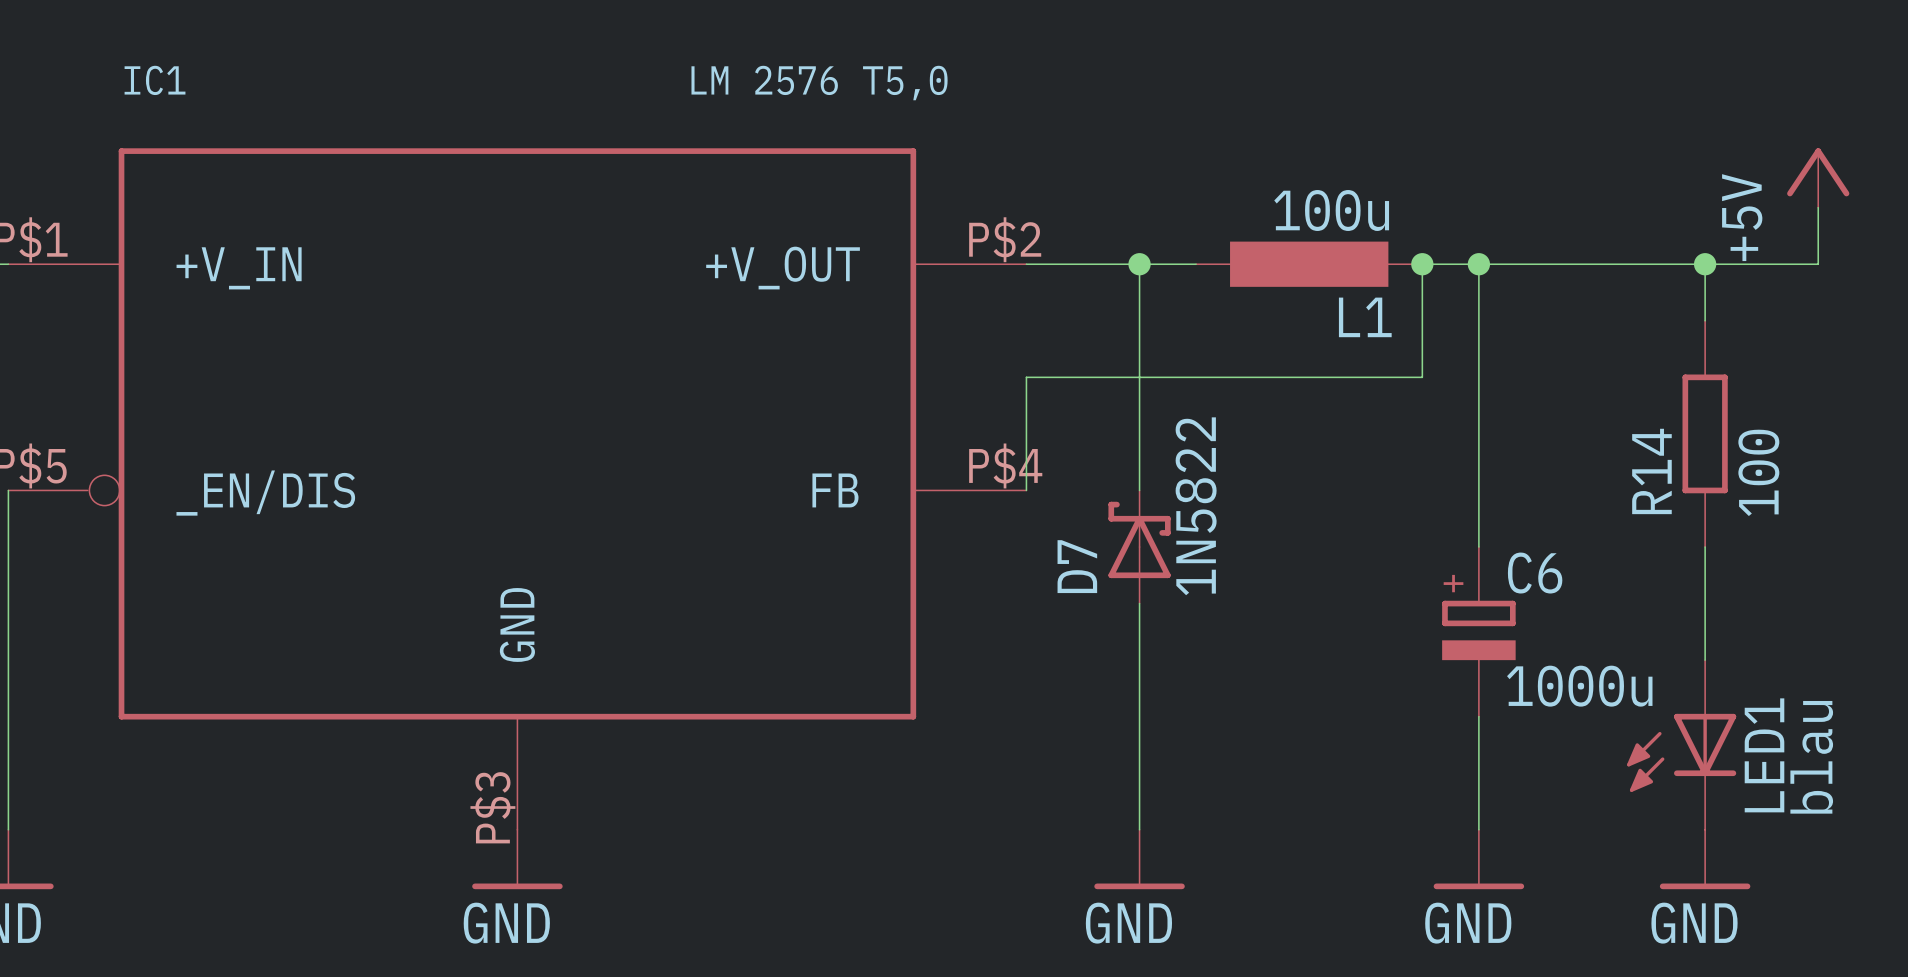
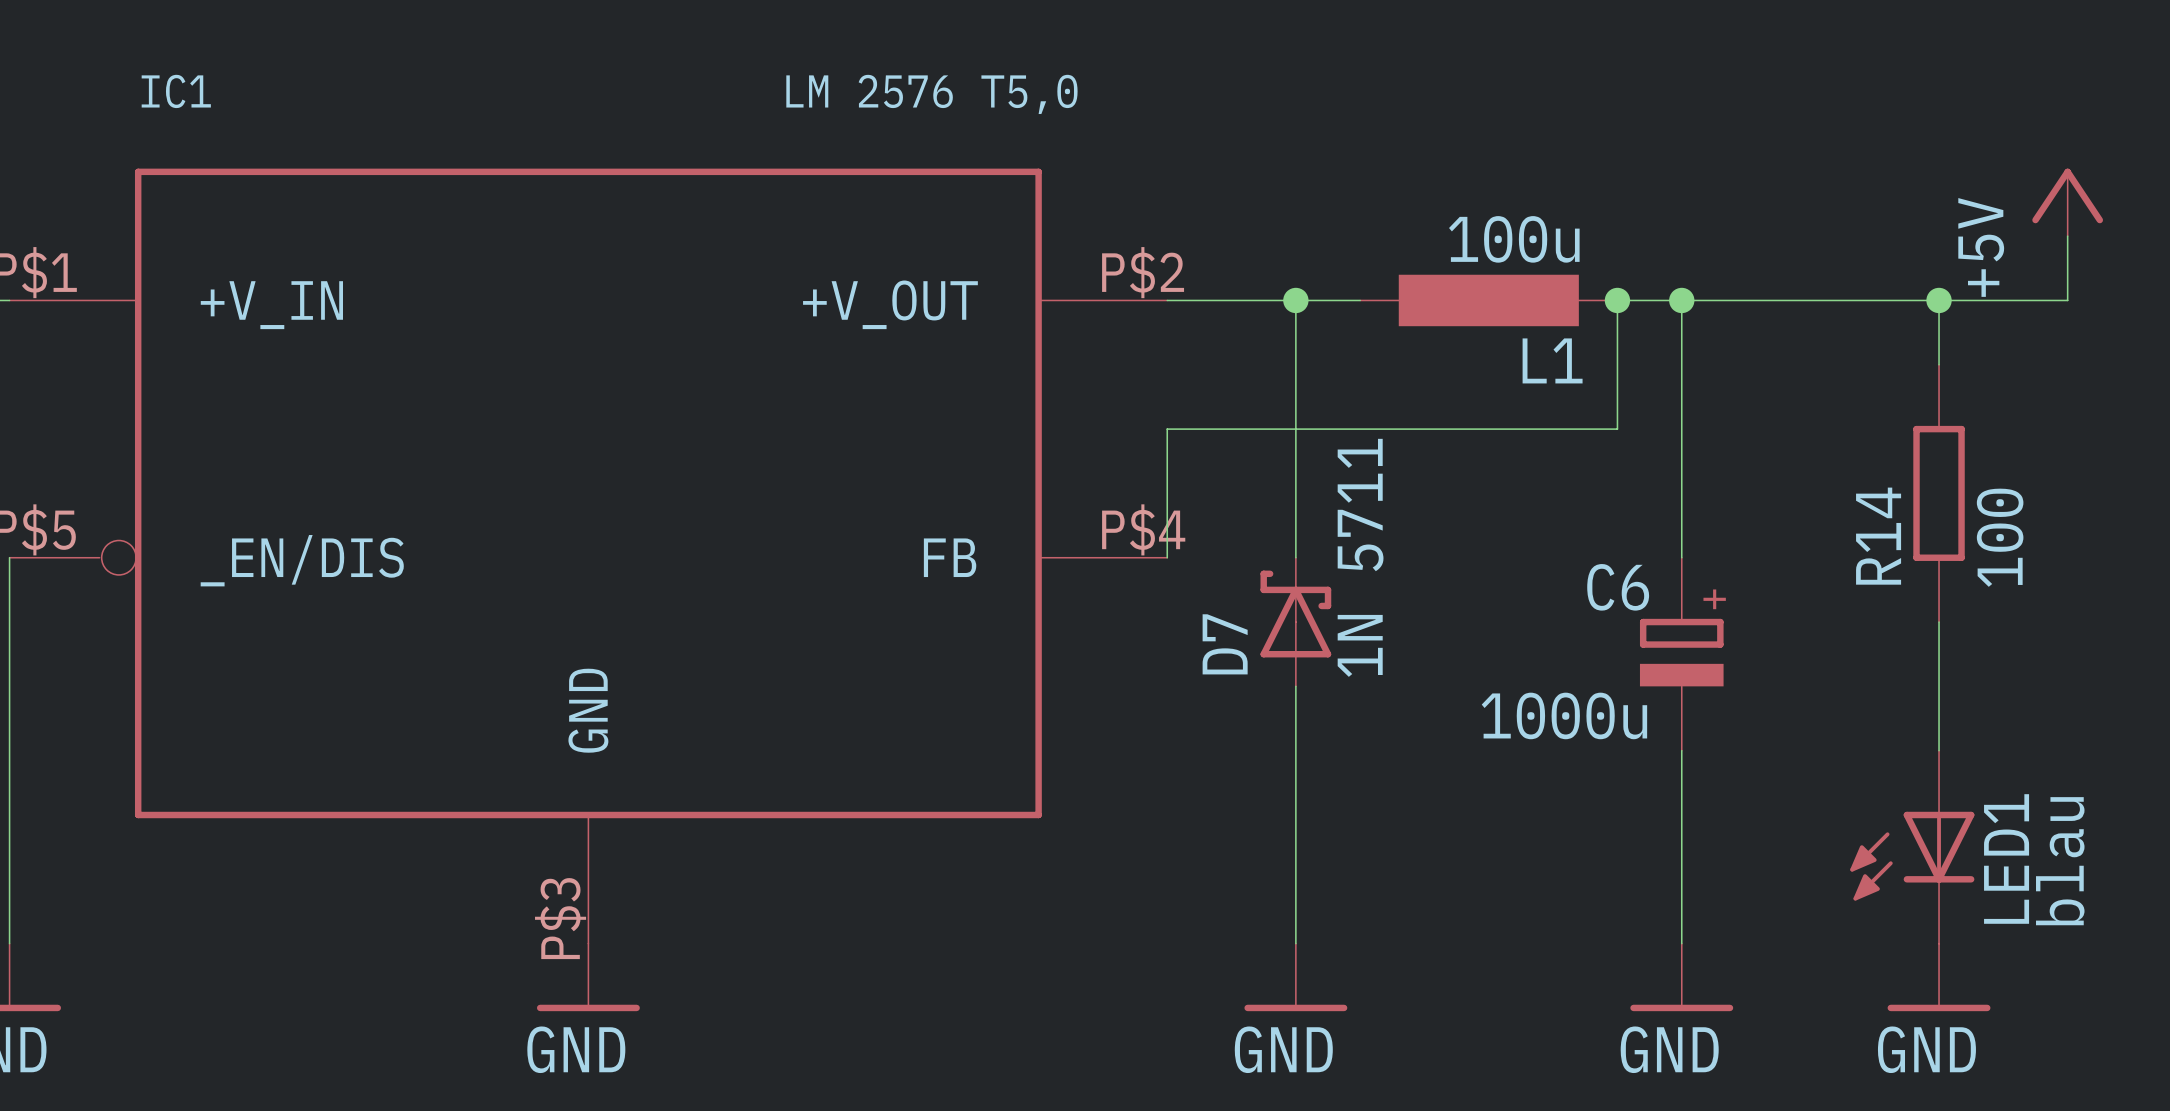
D7 value: 1N5822 (1196, 506) -> 1N 5711 (1360, 557)
C6 name position: C6 (1535, 573) -> C6 (1618, 587)
C6 text position: + (1453, 583) -> + (1714, 599)
C6 position: (1478, 631) -> (1681, 654)
C6 value position: 1000u (1579, 686) -> 1000u (1564, 715)

